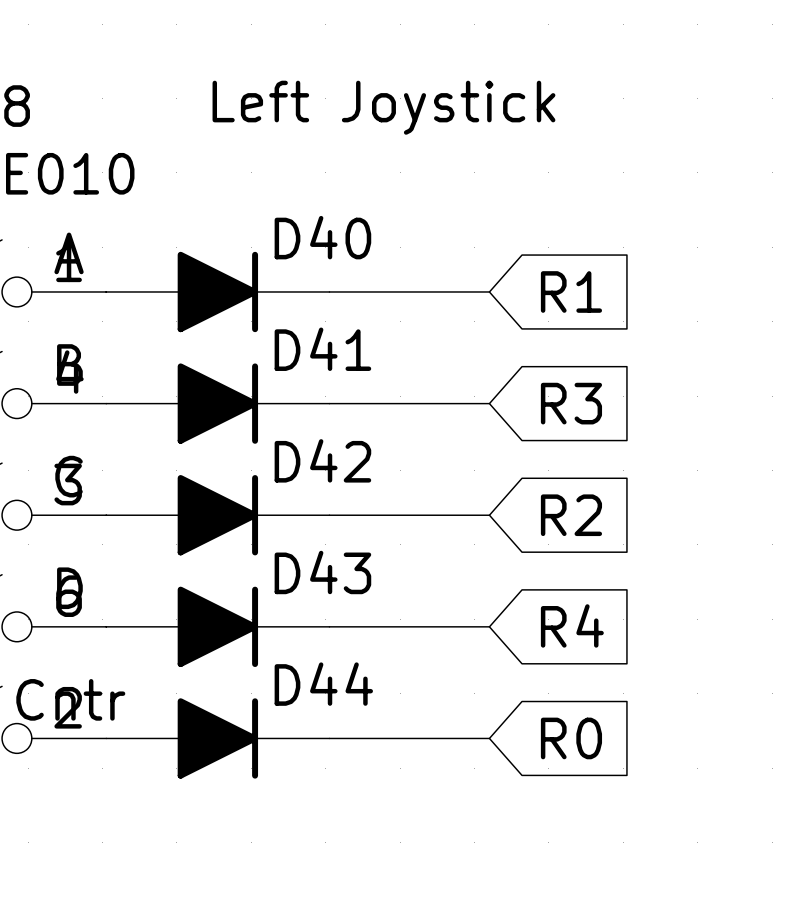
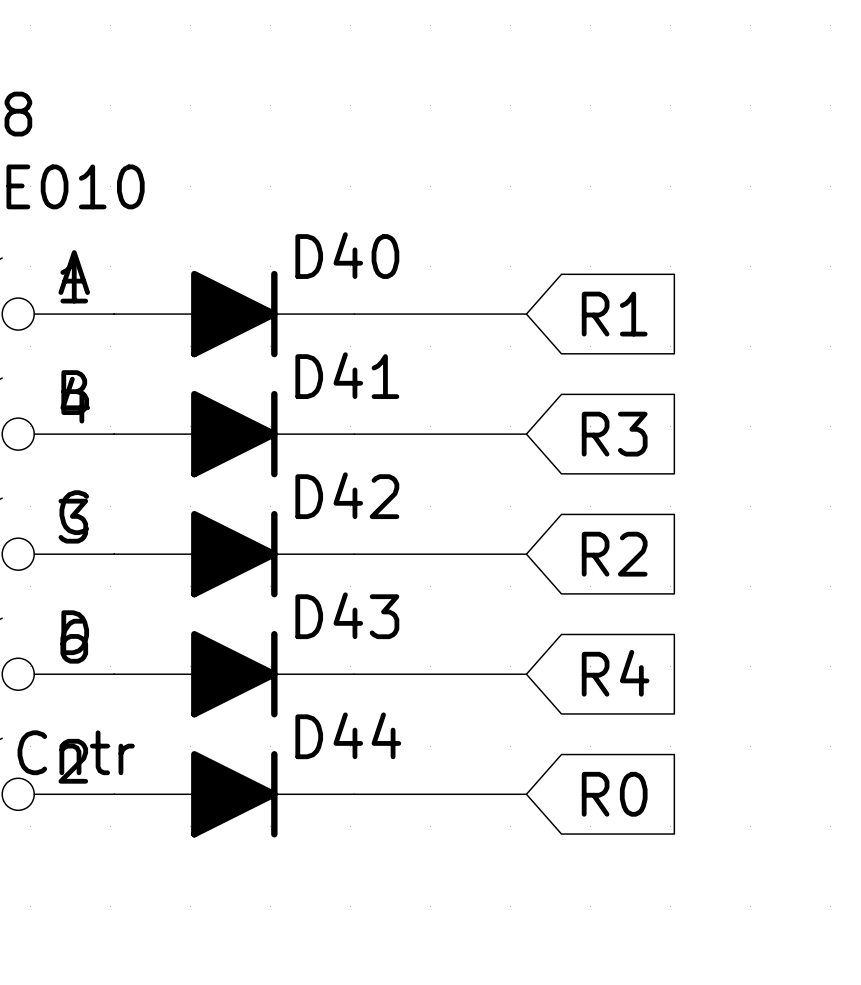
text: Left Joystick (383, 107) -> none

